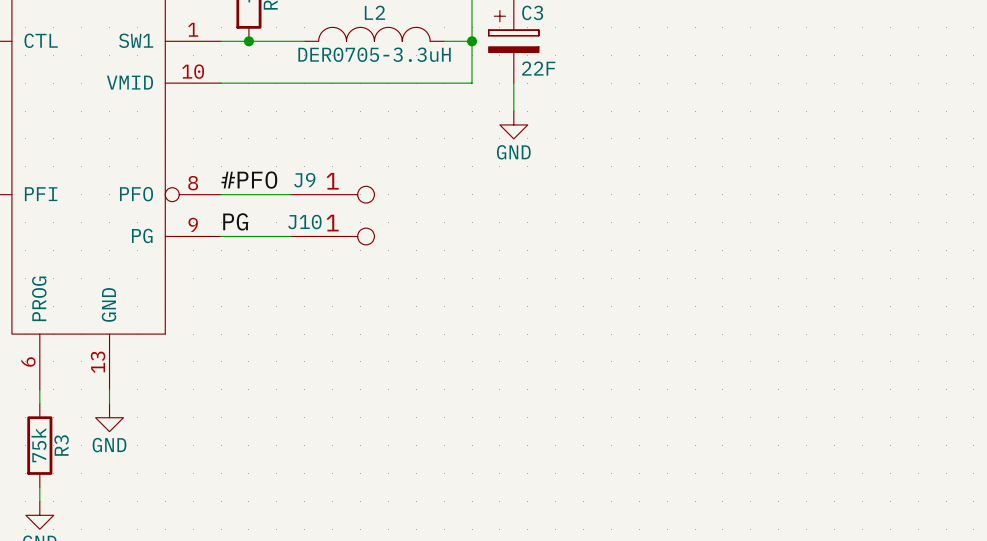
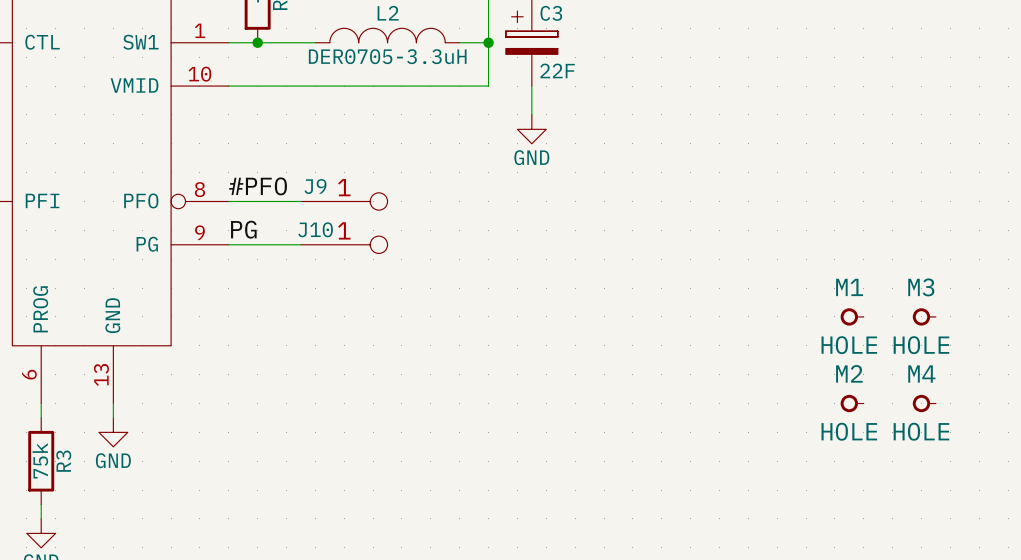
M1: none -> HOLE (852, 316)
M3: none -> HOLE (924, 316)
M2: none -> HOLE (852, 403)
M4: none -> HOLE (924, 403)

